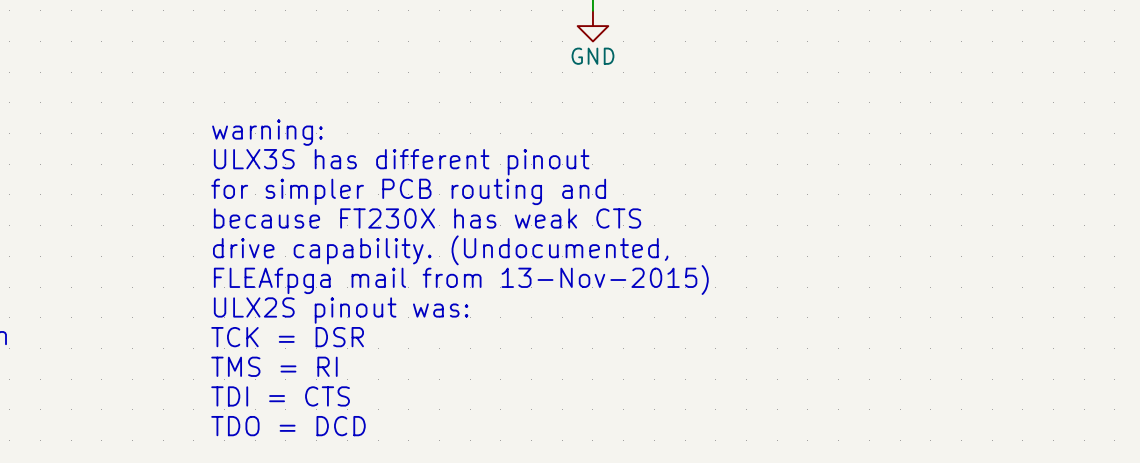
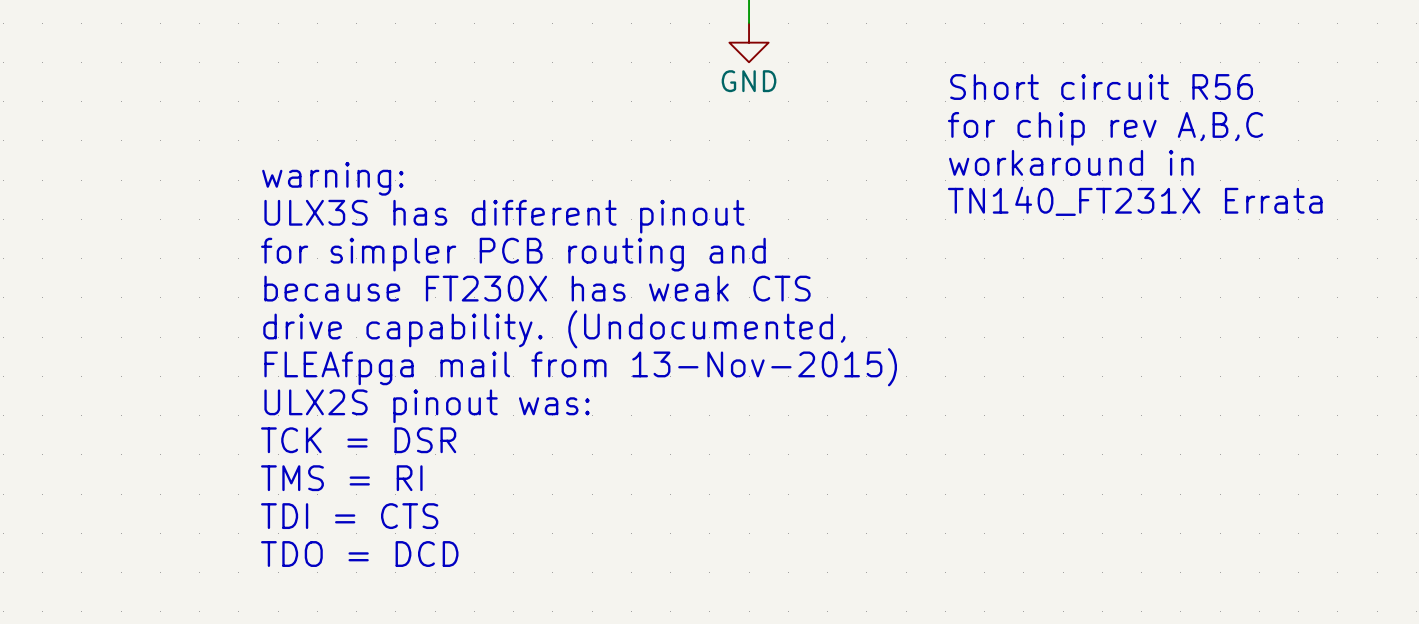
text: none -> Short circuit R56 (1101, 87)
text: none -> for chip rev A,B,C (1105, 128)
text: none -> workaround in (1071, 162)
text: none -> TN140_FT231X Errata (1135, 201)

